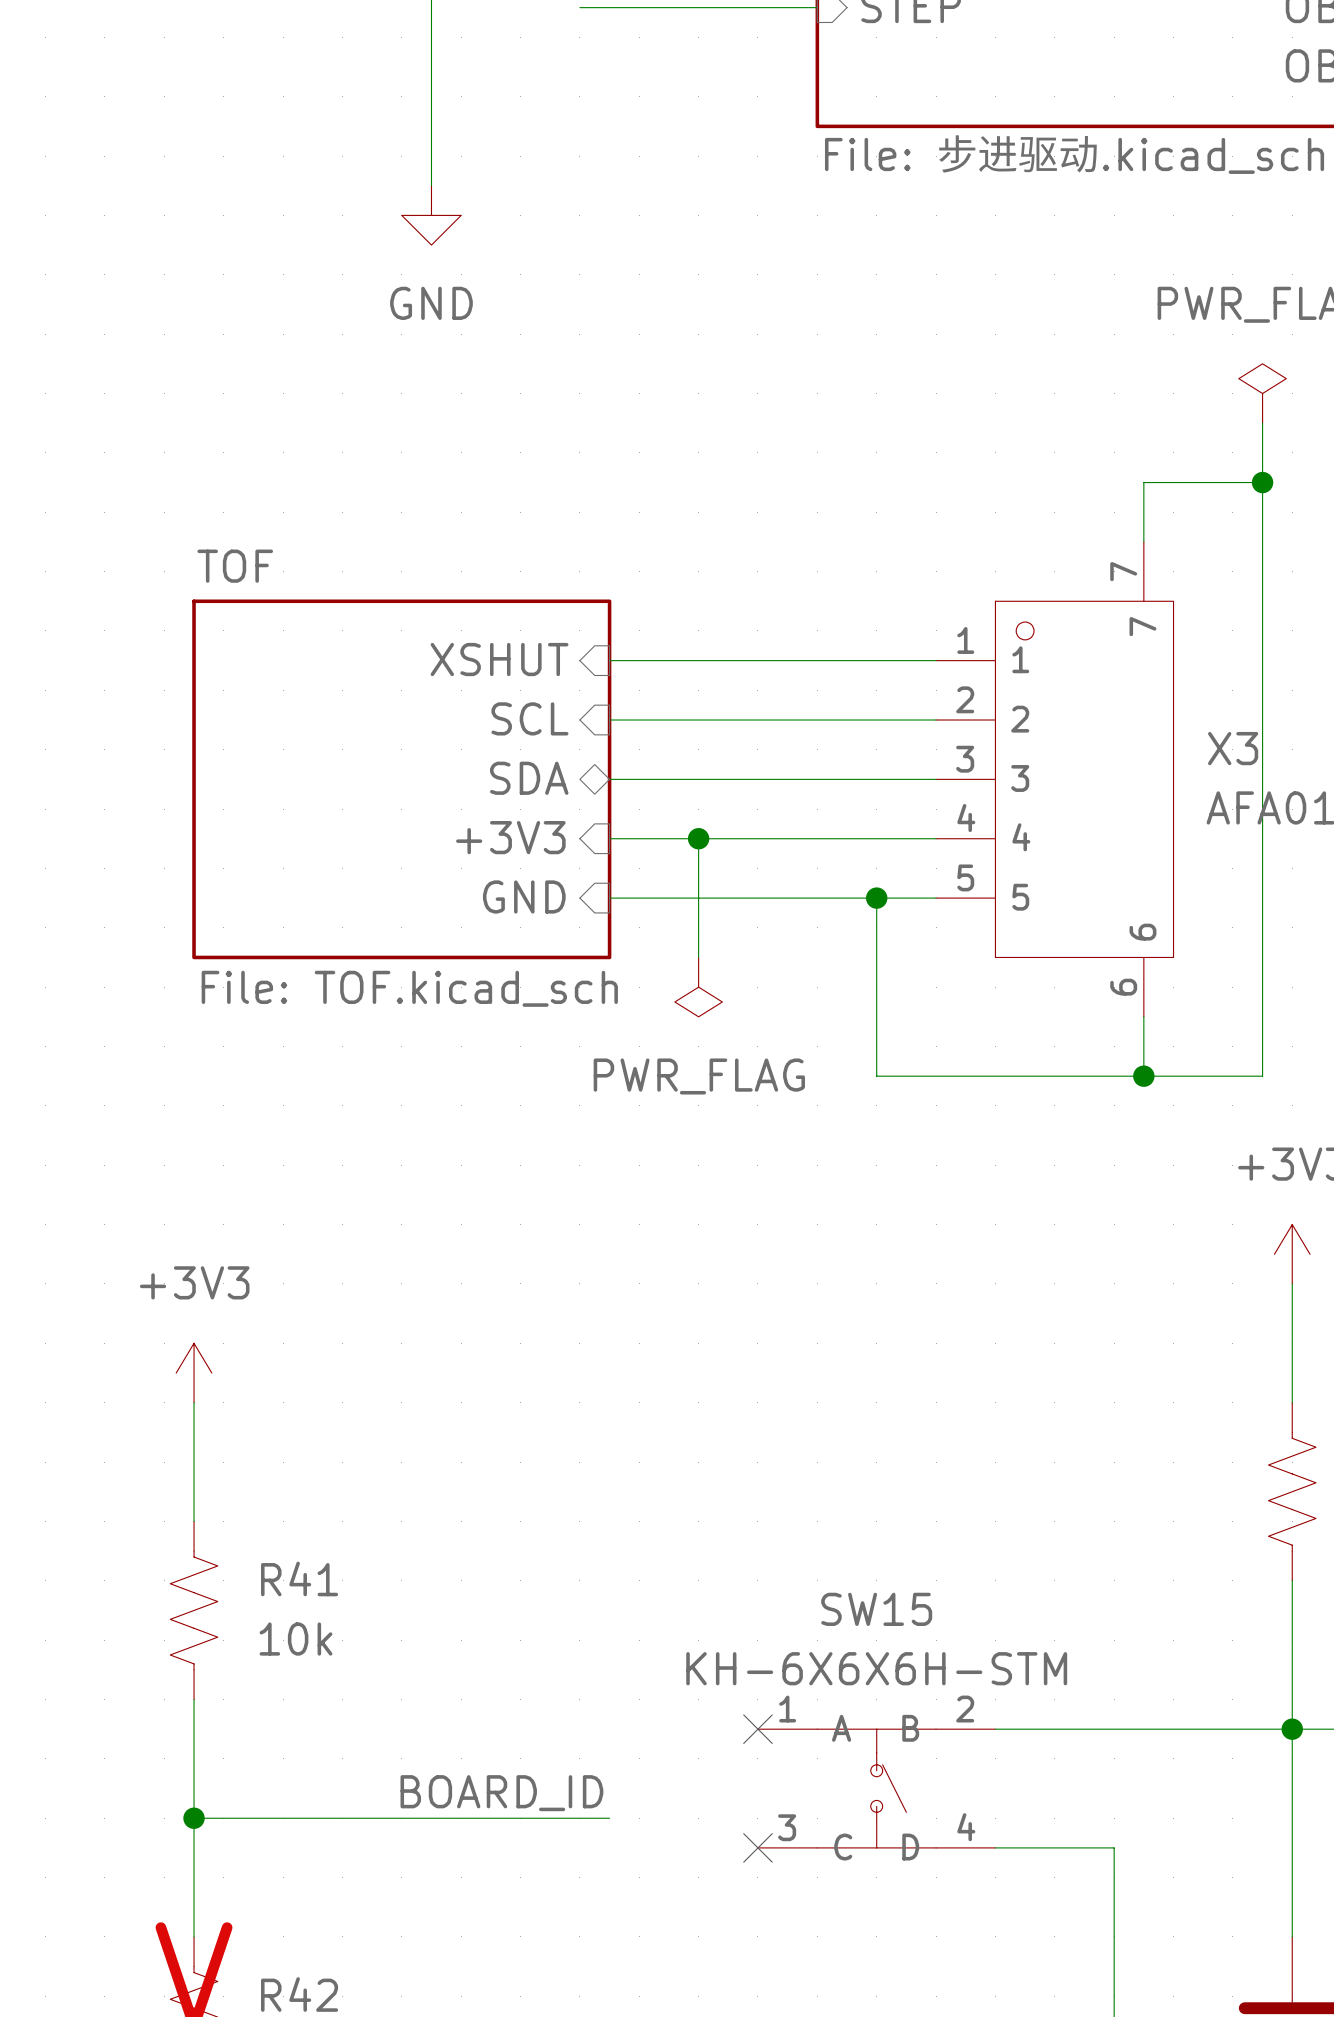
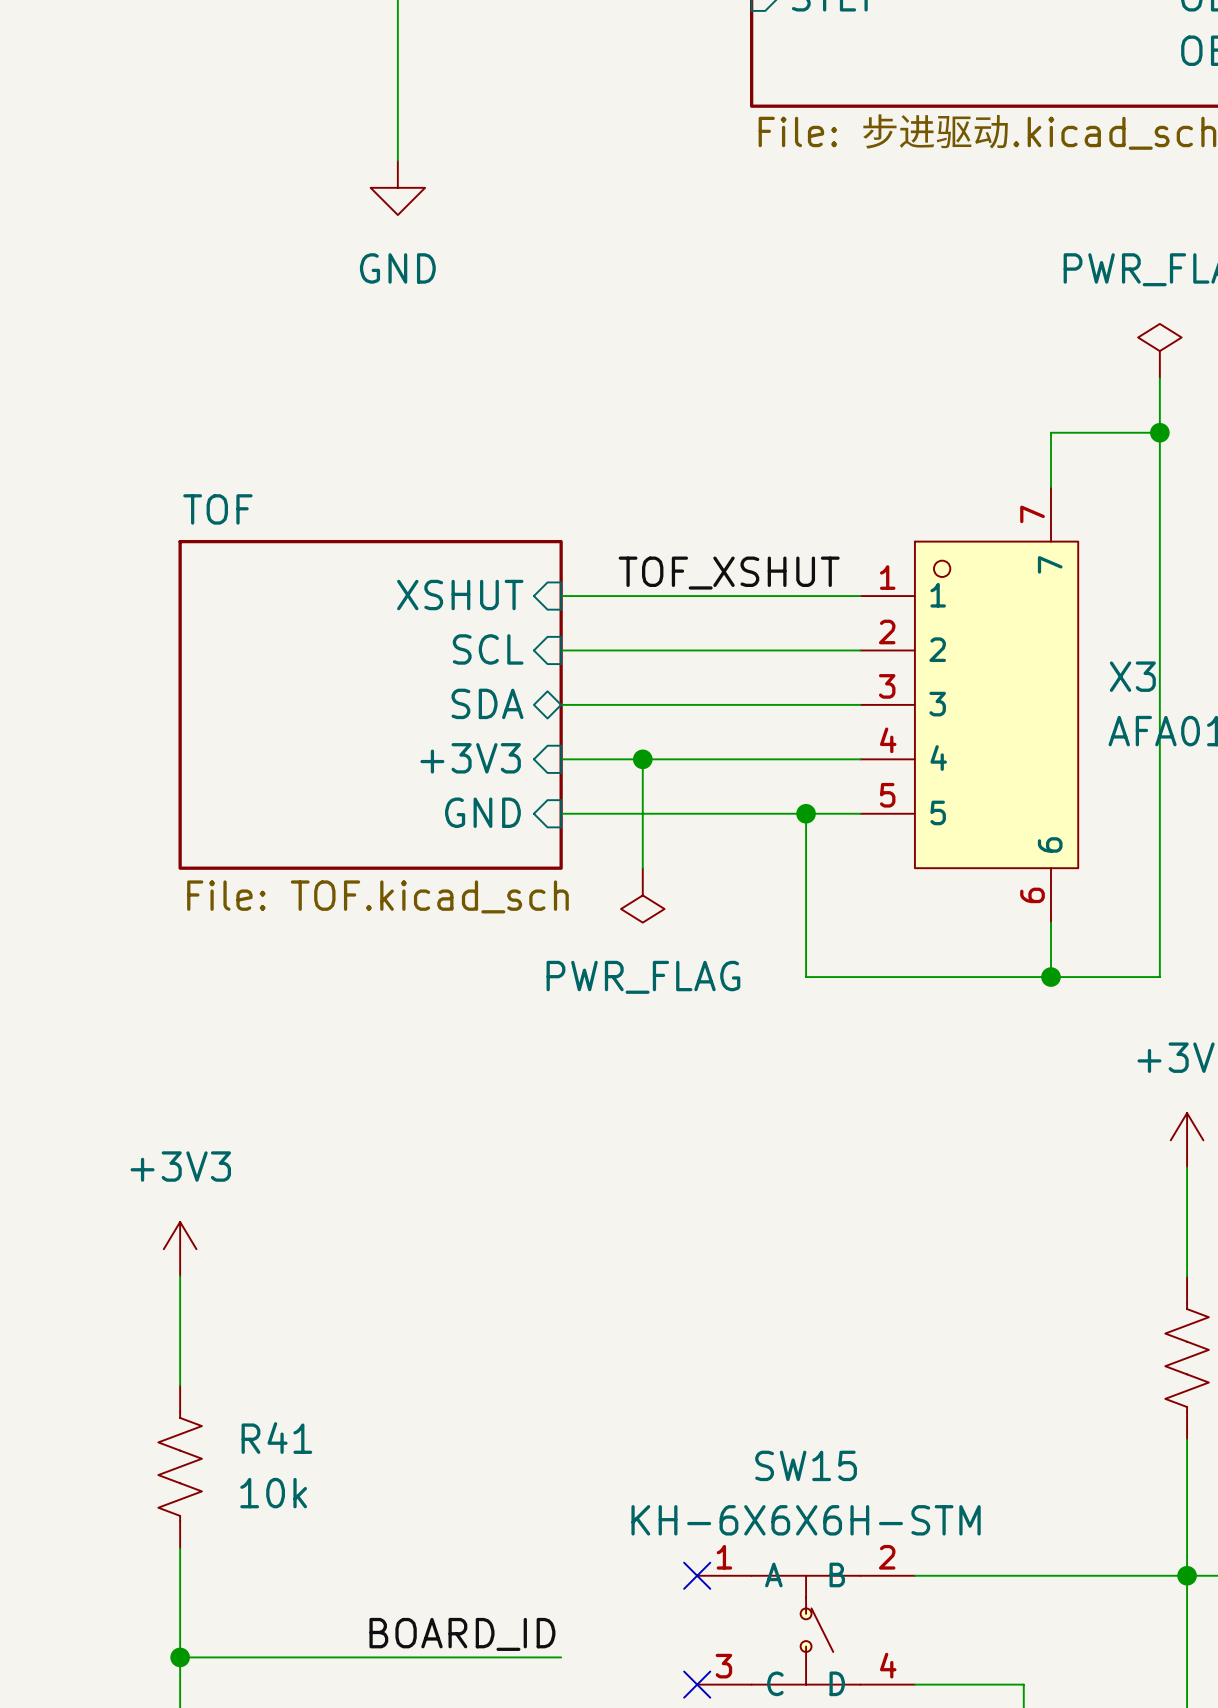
label: none -> TOF_XSHUT (729, 573)

